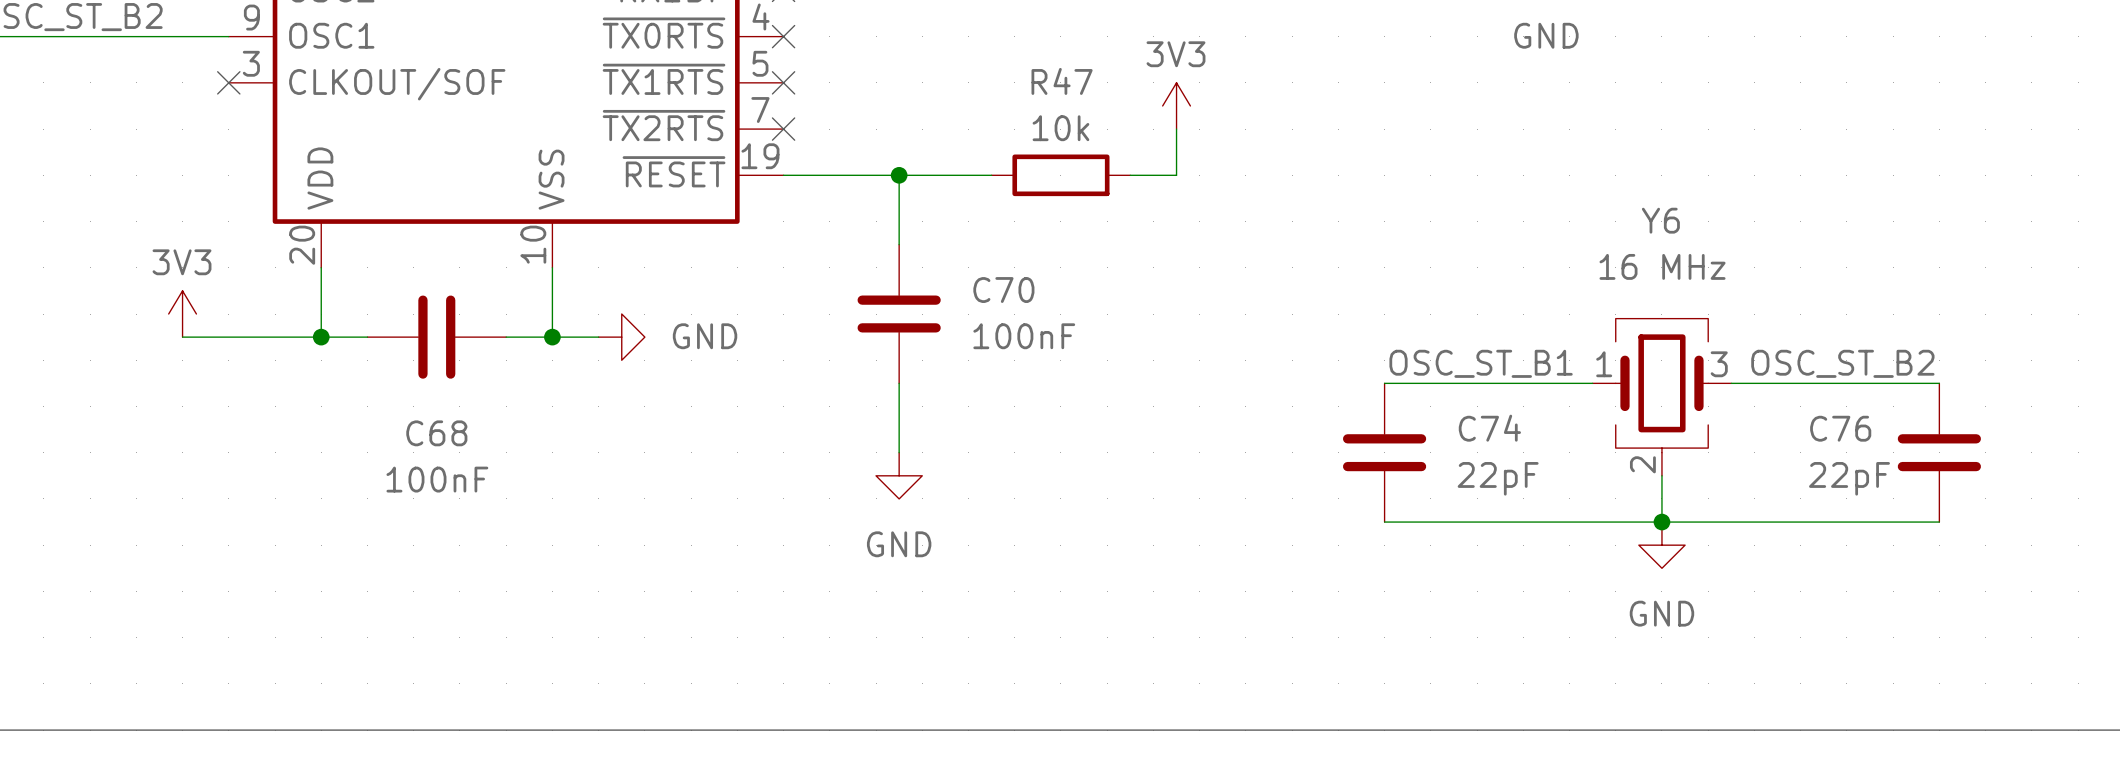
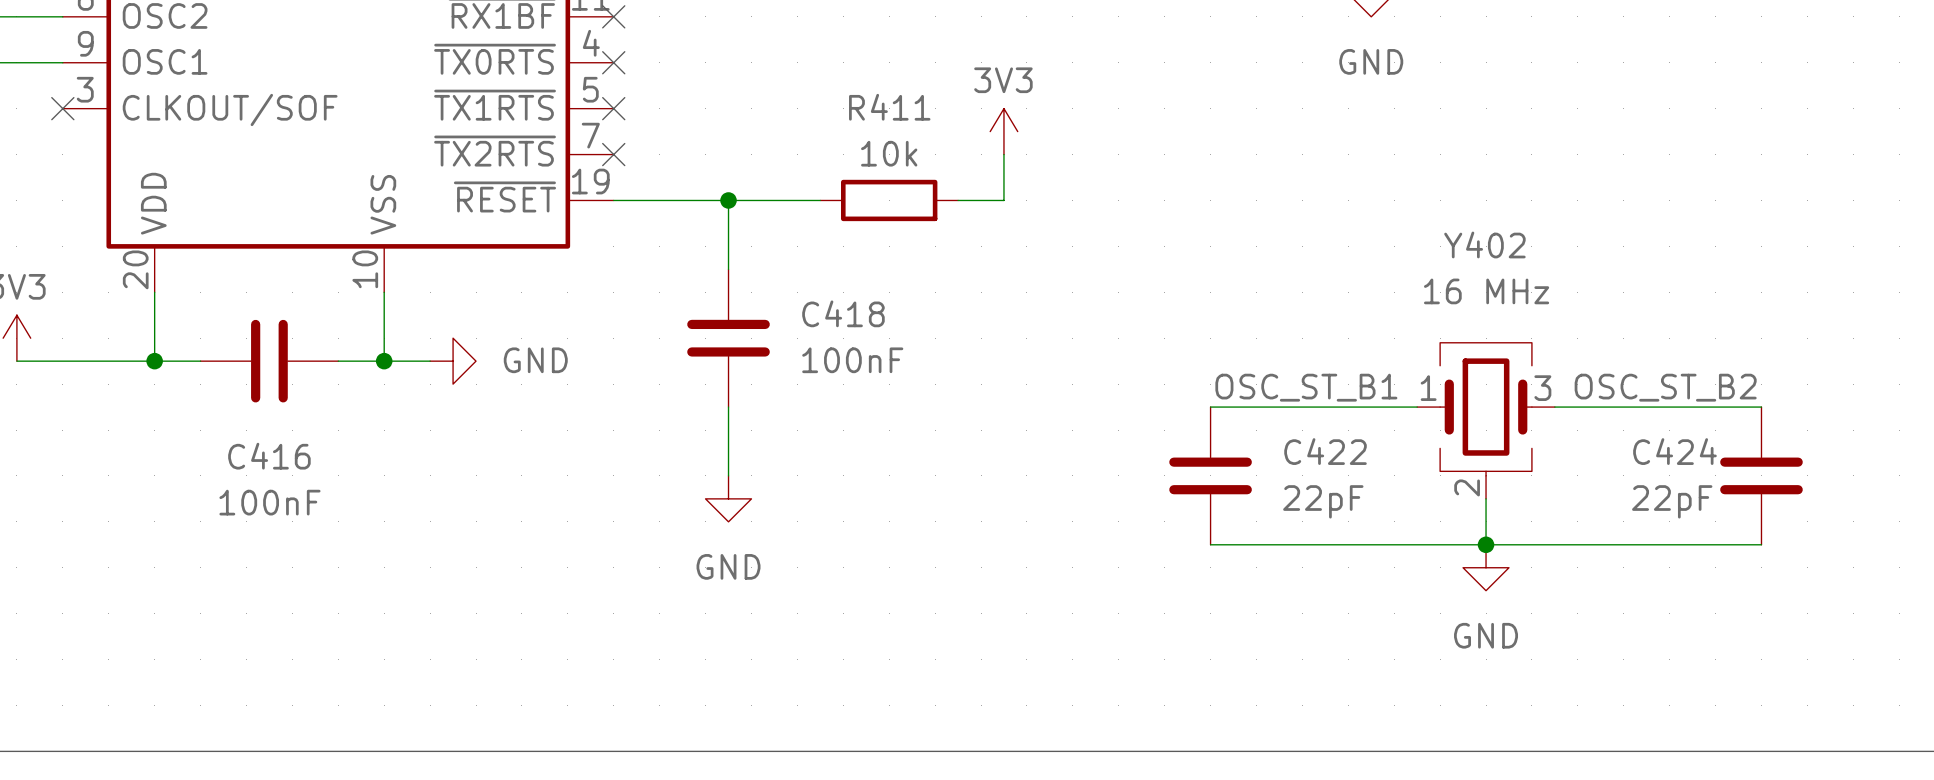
R47 name: R47 (1062, 81) -> R411 (889, 107)
Y6 name: Y6 (1660, 220) -> Y402 (1484, 244)
C70 name: C70 (1003, 290) -> C418 (843, 313)
C74 name: C74 (1489, 428) -> C422 (1325, 451)
C76 name: C76 (1840, 428) -> C424 (1674, 451)
C68 name: C68 (436, 433) -> C416 (269, 456)

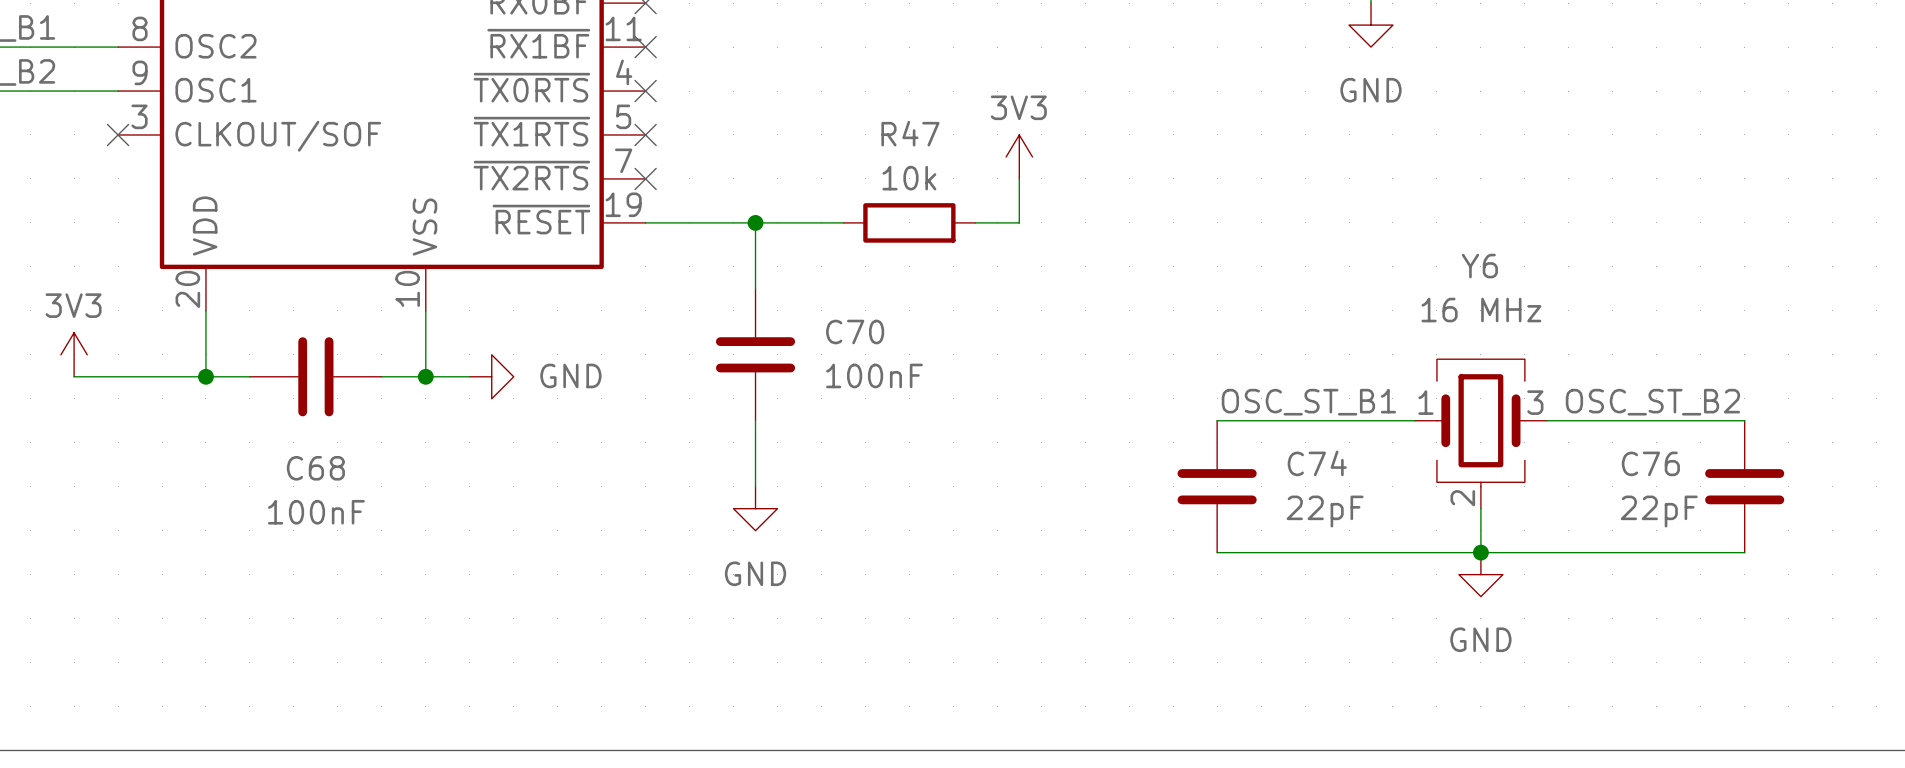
R411 name: R411 (889, 107) -> R47 (910, 133)
Y402 name: Y402 (1484, 244) -> Y6 (1479, 266)
C418 name: C418 (843, 313) -> C70 (855, 332)
C422 name: C422 (1325, 451) -> C74 (1317, 463)
C424 name: C424 (1674, 451) -> C76 (1650, 463)
C416 name: C416 (269, 456) -> C68 (315, 468)

